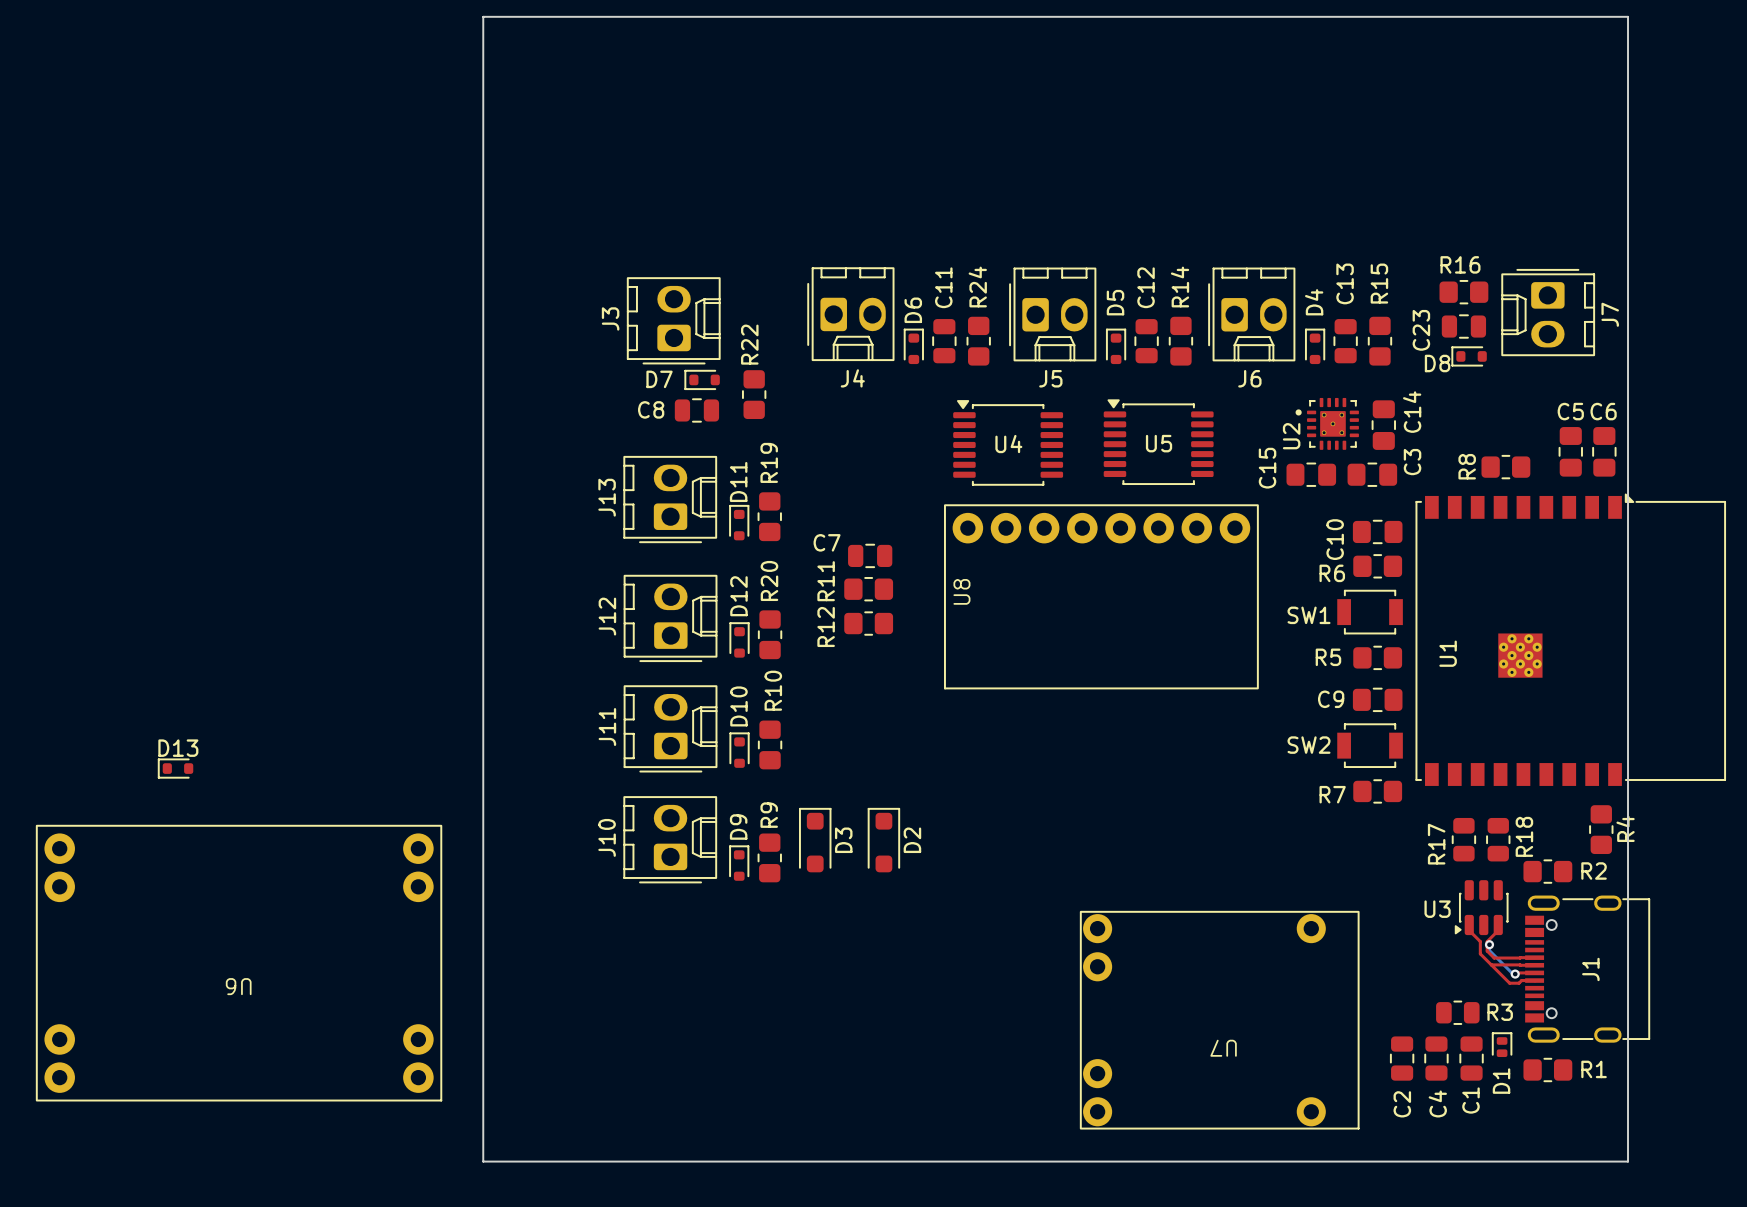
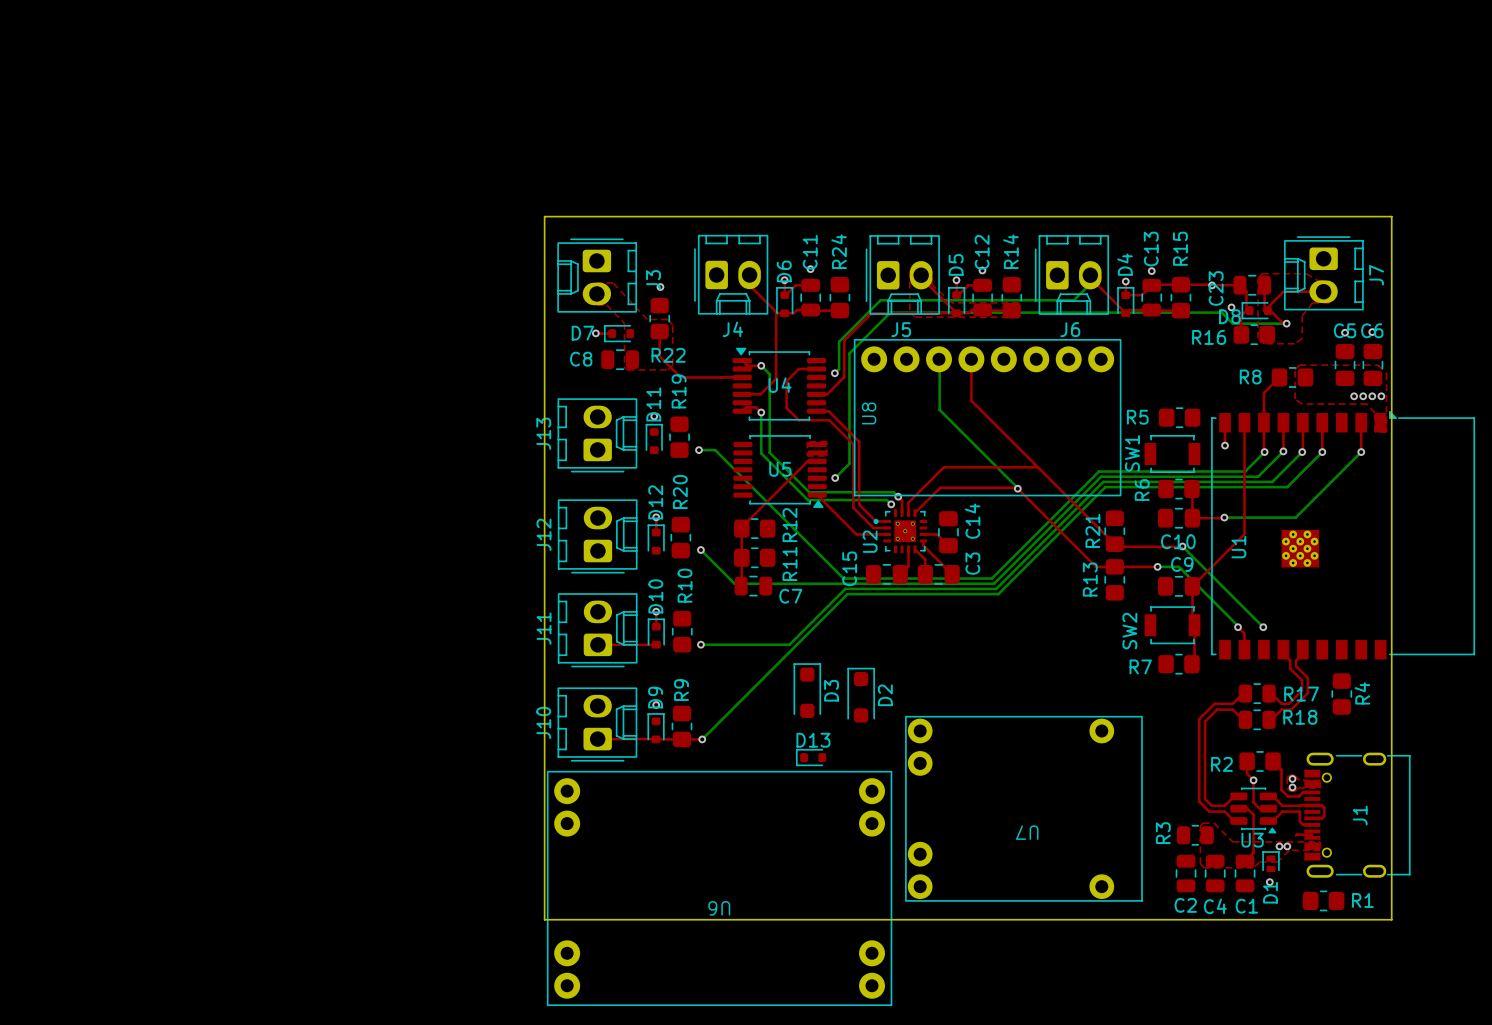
board edge: (1628, 245) (1628, 16) (483, 16) (483, 1161) (1628, 1161) (1628, 1073) -> (1391, 216) (544, 216) (544, 919) (1391, 919)
R16 name position: R16 (1460, 264) -> R16 (1209, 337)
R16 position: (1463, 292) -> (1254, 334)
via: none -> (810, 269)
top zone outline: none -> (909, 271) (932, 271) (931, 284) (951, 302) (1018, 302) (1018, 317) (915, 317) (909, 312) (909, 271)
via: none -> (982, 270)
via: none -> (1151, 271)
top zone outline: none -> (1262, 273) (1258, 278) (1258, 338) (1264, 343) (1294, 343) (1302, 338) (1302, 315) (1312, 302) (1329, 302) (1329, 280) (1318, 280) (1306, 273) (1262, 273)
top track: none -> (749, 274) (749, 285) (777, 313) (793, 313) (796, 310) (839, 310)
top track: none -> (921, 275) (921, 277) (957, 313)
top track: none -> (1090, 275) (1090, 277) (1125, 313) (1129, 310) (1180, 310)
bottom track: none -> (1090, 275) (1090, 283) (1073, 300) (880, 300) (839, 341) (839, 369) (834, 373)
J3 rotation: 0° (673, 320) -> 180° (597, 275)
top track: none -> (784, 280) (784, 295) (795, 285) (810, 285)
via: none -> (784, 280)
via: none -> (956, 280)
top track: none -> (956, 280) (956, 295) (968, 285) (982, 285)
top track: none -> (1125, 281) (1125, 295) (1142, 295) (1152, 284) (1212, 285)
via: none -> (1125, 281)
top zone outline: none -> (596, 282) (612, 282) (647, 319) (667, 319) (672, 325) (672, 365) (668, 369) (627, 369) (624, 367) (624, 323) (606, 305) (597, 305) (596, 282)
top track: none -> (1212, 285) (1239, 285) (1246, 291) (1246, 310) (1241, 315) (1241, 334)
via: none -> (1212, 285)
top track: none -> (1264, 285) (1264, 310)
via: none -> (660, 287)
top track: none -> (1323, 291) (1283, 291) (1264, 310)
R22 name rotation: 0° (749, 344) -> 90° clockwise (668, 355)
R22 name position: R22 (749, 344) -> R22 (668, 355)
via: none -> (1231, 307)
top track: none -> (1011, 310) (971, 310) (968, 313) (871, 313) (844, 340) (844, 377) (827, 394) (816, 394)
top track: none -> (1264, 310) (1270, 310) (1283, 323) (1286, 323)
top track: none -> (776, 311) (776, 378) (760, 394) (742, 394)
bottom track: none -> (1286, 323) (1232, 323) (1221, 312) (890, 312) (849, 353) (849, 463) (835, 478)
via: none -> (1286, 323)
D7 position: (702, 379) -> (619, 333)
top track: none -> (659, 331) (659, 356) (680, 377) (721, 377)
via: none -> (1372, 332)
via: none -> (1345, 332)
top track: none -> (595, 333) (612, 333)
via: none -> (595, 333)
R22 position: (754, 394) -> (659, 318)
C8 position: (696, 410) -> (620, 359)
bottom track: none -> (938, 359) (939, 409) (1017, 488)
top track: none -> (971, 359) (971, 400) (1117, 546) (1182, 546)
top track: none -> (742, 360) (747, 365) (761, 365)
top zone outline: none -> (1299, 365) (1295, 369) (1295, 399) (1301, 404) (1367, 404) (1374, 413) (1374, 431) (1386, 431) (1386, 373) (1378, 365) (1299, 365)
bottom track: none -> (761, 365) (769, 374) (769, 452) (809, 492) (893, 492) (898, 496)
via: none -> (761, 365)
U2 position: (1327, 423) -> (900, 531)
top track: none -> (816, 369) (798, 369) (786, 381) (786, 407) (798, 420) (829, 420) (853, 444) (853, 507) (873, 527) (887, 527)
C14 position: (1383, 425) -> (948, 532)
via: none -> (834, 373)
top track: none -> (721, 377) (742, 377)
top track: none -> (1279, 377) (1263, 393) (1264, 452)
U4 position: (1008, 442) -> (779, 384)
U5 rotation: 0° (1158, 442) -> 180° (780, 471)
U5 position: (1158, 442) -> (780, 471)
C5 position: (1570, 451) -> (1345, 364)
C6 position: (1604, 451) -> (1372, 364)
via: none -> (1354, 396)
via: none -> (1363, 396)
via: none -> (1372, 396)
via: none -> (1381, 396)
R8 name rotation: 0° (1467, 466) -> 90° clockwise (1250, 376)
R8 position: (1505, 467) -> (1292, 377)
top track: none -> (742, 411) (746, 407) (756, 407) (761, 412)
top track: none -> (816, 411) (828, 411) (859, 441) (859, 504) (876, 521) (887, 521)
C15 position: (1311, 474) -> (886, 574)
C3 position: (1372, 474) -> (938, 574)
bottom track: none -> (761, 412) (761, 453) (807, 500) (886, 500) (891, 504)
via: none -> (761, 412)
via: none -> (654, 416)
top track: none -> (1225, 422) (1225, 445)
top track: none -> (1244, 422) (1244, 534) (1192, 586) (1194, 658) (1191, 664)
top track: none -> (1283, 422) (1283, 451)
top track: none -> (1302, 422) (1302, 452)
top track: none -> (1322, 422) (1322, 452)
top track: none -> (1361, 422) (1361, 452)
J13 position: (670, 499) -> (597, 435)
top zone outline: none -> (807, 441) (826, 441) (826, 455) (807, 455) (807, 441)
via: none -> (1225, 445)
R19 position: (769, 516) -> (679, 437)
bottom track: none -> (698, 450) (715, 450) (843, 578) (991, 578) (1099, 471) (1245, 471) (1264, 452)
via: none -> (698, 450)
D11 position: (739, 522) -> (654, 438)
via: none -> (1264, 452)
bottom track: none -> (1283, 451) (1258, 476) (1101, 476) (994, 583) (734, 583) (700, 550)
via: none -> (1283, 451)
bottom track: none -> (1302, 452) (1272, 481) (1103, 481) (996, 588) (845, 588) (789, 644) (700, 644)
via: none -> (1302, 452)
bottom track: none -> (1322, 452) (1287, 487) (1105, 487) (998, 594) (847, 594) (702, 739)
via: none -> (1322, 452)
bottom track: none -> (1361, 452) (1295, 517) (1224, 517)
via: none -> (1361, 452)
C10 position: (1377, 531) -> (1178, 518)
top track: none -> (817, 461) (807, 461) (741, 527) (741, 586)
C10 name rotation: 0° (1335, 539) -> 90° clockwise (1178, 541)
top track: none -> (1037, 467) (943, 467) (908, 502) (908, 513)
C7 name position: C7 (827, 542) -> C7 (790, 596)
via: none -> (835, 478)
C7 position: (870, 555) -> (753, 586)
via: none -> (1017, 488)
top track: none -> (1192, 490) (1192, 518) (1224, 517)
top track: none -> (817, 495) (856, 534) (887, 534)
R6 name rotation: 0° (1332, 573) -> 90° counterclockwise (1142, 490)
top track: none -> (898, 496) (902, 500) (902, 513)
via: none -> (898, 496)
R11 name position: R11 (826, 581) -> R11 (789, 563)
via: none -> (891, 504)
R11 position: (868, 589) -> (754, 557)
top track: none -> (914, 513) (940, 487) (1016, 487) (1095, 566) (1157, 566)
U8 position: (1101, 596) -> (987, 417)
top track: none -> (656, 517) (656, 532)
via: none -> (656, 517)
via: none -> (1224, 517)
SW1 position: (1370, 612) -> (1172, 454)
R21: none -> (1114, 531)
SW1 name rotation: 0° (1309, 615) -> 90° counterclockwise (1132, 453)
J12 position: (670, 618) -> (597, 536)
top track: none -> (923, 534) (937, 534) (948, 545)
R12 position: (868, 623) -> (754, 528)
R12 name position: R12 (826, 626) -> R12 (789, 525)
top track: none -> (923, 540) (923, 545) (952, 574)
bottom track: none -> (1182, 546) (1263, 627)
via: none -> (1182, 546)
R20 position: (770, 634) -> (680, 537)
top track: none -> (908, 549) (908, 566) (900, 574)
top track: none -> (914, 549) (925, 559) (925, 574)
via: none -> (700, 550)
D12 position: (739, 639) -> (656, 539)
U1 position: (1570, 639) -> (1343, 535)
bottom track: none -> (1157, 566) (1178, 566) (1238, 627)
via: none -> (1157, 566)
R5 position: (1377, 657) -> (1179, 417)
R13: none -> (1114, 579)
C9 name position: C9 (1331, 699) -> C9 (1182, 564)
C9 position: (1377, 699) -> (1178, 586)
top track: none -> (656, 611) (656, 626)
via: none -> (656, 611)
J11 position: (670, 728) -> (597, 630)
top track: none -> (1238, 627) (1244, 633) (1244, 649)
via: none -> (1238, 627)
via: none -> (1263, 627)
R10 position: (770, 744) -> (682, 631)
SW2 name rotation: 0° (1309, 745) -> 90° counterclockwise (1129, 631)
SW2 position: (1370, 745) -> (1172, 625)
top track: none -> (597, 644) (656, 644)
via: none -> (700, 644)
D10 position: (739, 750) -> (656, 633)
top track: none -> (1283, 649) (1283, 653) (1290, 660) (1290, 668) (1302, 680) (1302, 690) (1288, 703) (1281, 703) (1271, 693) (1269, 693)
top track: none -> (1302, 649) (1302, 653) (1296, 660) (1296, 666) (1307, 678) (1307, 693) (1291, 709) (1281, 709) (1271, 719) (1269, 719)
D13 position: (175, 768) -> (811, 757)
R7 position: (1377, 791) -> (1178, 664)
top track: none -> (1245, 693) (1242, 693) (1232, 703) (1214, 703) (1199, 719) (1199, 801) (1209, 811) (1224, 811) (1234, 821) (1238, 821)
via: none -> (656, 705)
R4 position: (1601, 829) -> (1341, 694)
top track: none -> (1245, 719) (1242, 719) (1232, 709) (1217, 709) (1205, 721) (1205, 799) (1211, 805) (1224, 805) (1234, 796) (1238, 796)
J10 position: (670, 839) -> (597, 724)
R17 rotation: 0° (1463, 839) -> 90° clockwise (1257, 693)
R17 position: (1463, 839) -> (1257, 693)
R18 rotation: 0° (1498, 839) -> 90° clockwise (1257, 719)
R18 position: (1498, 839) -> (1257, 719)
D3 position: (815, 840) -> (807, 690)
D2 position: (883, 840) -> (861, 695)
R17 name position: R17 (1436, 844) -> R17 (1301, 694)
R9 position: (769, 857) -> (682, 726)
top track: none -> (597, 739) (702, 739)
via: none -> (702, 739)
D9 position: (739, 863) -> (656, 728)
R2 position: (1547, 871) -> (1260, 761)
R2 name position: R2 (1594, 871) -> R2 (1221, 764)
top track: none -> (1247, 761) (1247, 773) (1253, 780) (1253, 802) (1259, 808) (1268, 808)
top track: none -> (1273, 761) (1281, 769) (1281, 790) (1287, 796) (1298, 796) (1303, 792) (1312, 792)
top zone outline: none -> (1289, 775) (1294, 775) (1299, 780) (1320, 780) (1320, 788) (1298, 788) (1295, 791) (1289, 791) (1287, 788) (1287, 777) (1289, 775)
U3 rotation: 0° (1481, 907) -> 90° counterclockwise (1253, 810)
U3 position: (1481, 907) -> (1253, 810)
via: none -> (1292, 778)
via: none -> (1253, 780)
via: none -> (1292, 787)
top track: (1469, 924) (1469, 930) (1480, 941) (1480, 953) (1509, 983) (1519, 983) (1521, 980) (1535, 981) -> none
top track: (1498, 924) (1498, 930) (1487, 941) (1487, 951) (1494, 958) (1534, 957) -> none
top track: none -> (1268, 796) (1273, 796) (1282, 805) (1321, 805) (1324, 807) (1324, 816) (1321, 818) (1312, 818)
top track: none -> (1238, 808) (1247, 808) (1253, 814) (1253, 852) (1245, 861)
bottom track: (1489, 944) (1489, 950) (1515, 974) -> none
via: (1489, 944) -> none
top track: none -> (1268, 821) (1273, 821) (1282, 811) (1299, 811) (1299, 821) (1303, 824) (1312, 824)
top zone outline: none -> (1202, 823) (1200, 825) (1200, 863) (1204, 867) (1253, 867) (1259, 862) (1277, 862) (1289, 850) (1320, 850) (1320, 841) (1232, 841) (1214, 823) (1202, 823)
U6 position: (239, 963) -> (719, 888)
top track: (1491, 964) (1534, 965) -> none
J1 position: (1587, 969) -> (1357, 815)
via: (1515, 974) -> none
via: none -> (1279, 846)
via: none -> (1287, 846)
R3 position: (1457, 1012) -> (1195, 835)
R3 name rotation: 0° (1500, 1012) -> 90° counterclockwise (1163, 833)
R3 name position: R3 (1500, 1012) -> R3 (1163, 833)
U7 position: (1219, 1020) -> (1023, 808)
via: none -> (1269, 882)
D1 position: (1502, 1044) -> (1270, 861)
C2 position: (1402, 1058) -> (1186, 873)
C4 position: (1436, 1058) -> (1215, 873)
C1 position: (1471, 1058) -> (1245, 873)
R1 position: (1547, 1069) -> (1323, 900)
C1 name rotation: 0° (1470, 1100) -> 90° clockwise (1246, 906)
C4 name rotation: 0° (1437, 1103) -> 90° clockwise (1215, 906)
C2 name rotation: 0° (1402, 1104) -> 90° clockwise (1185, 905)

